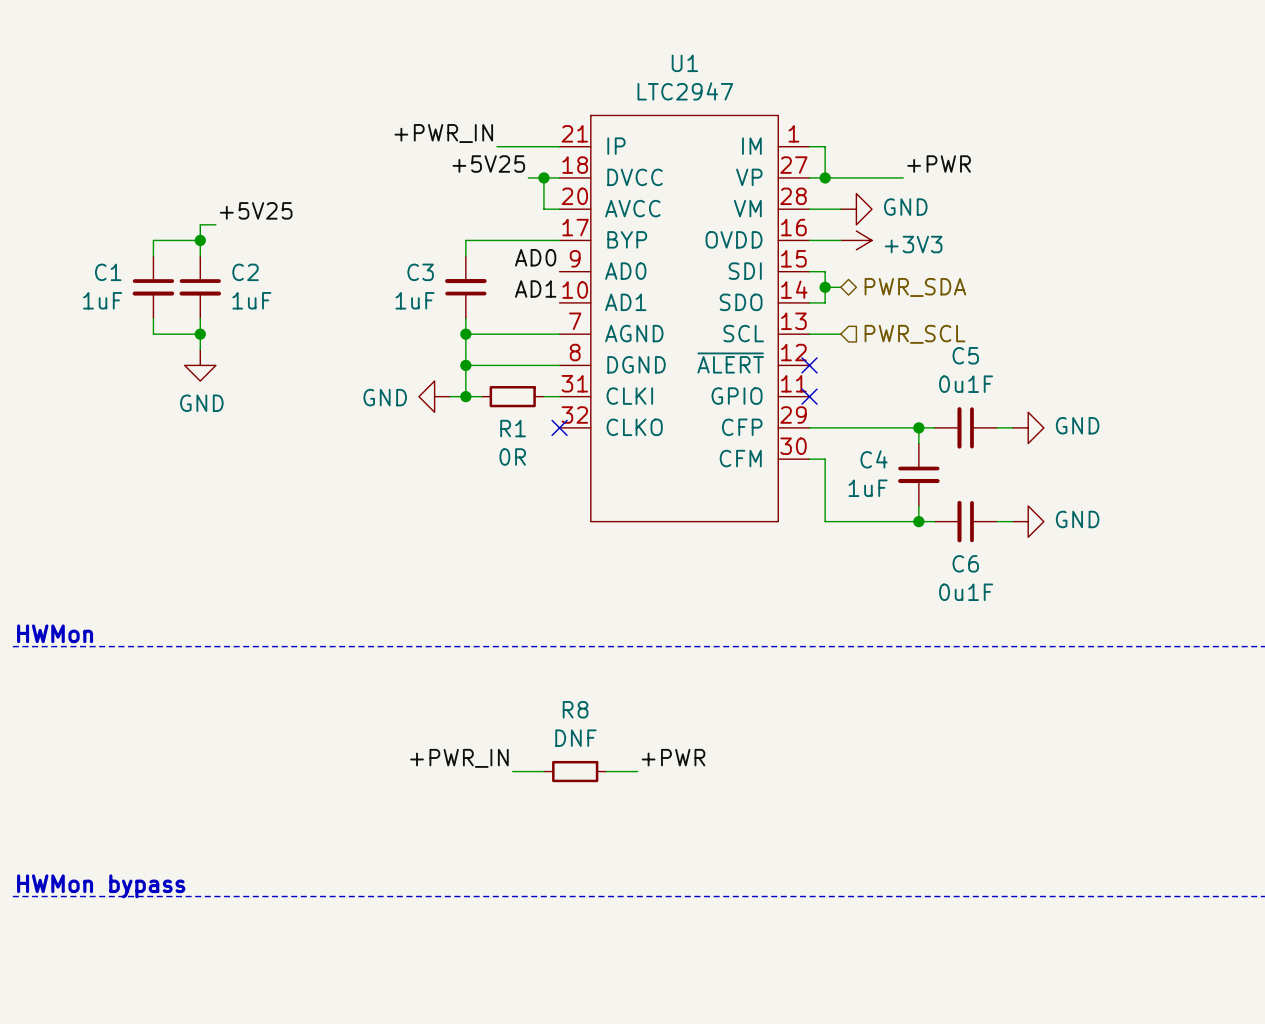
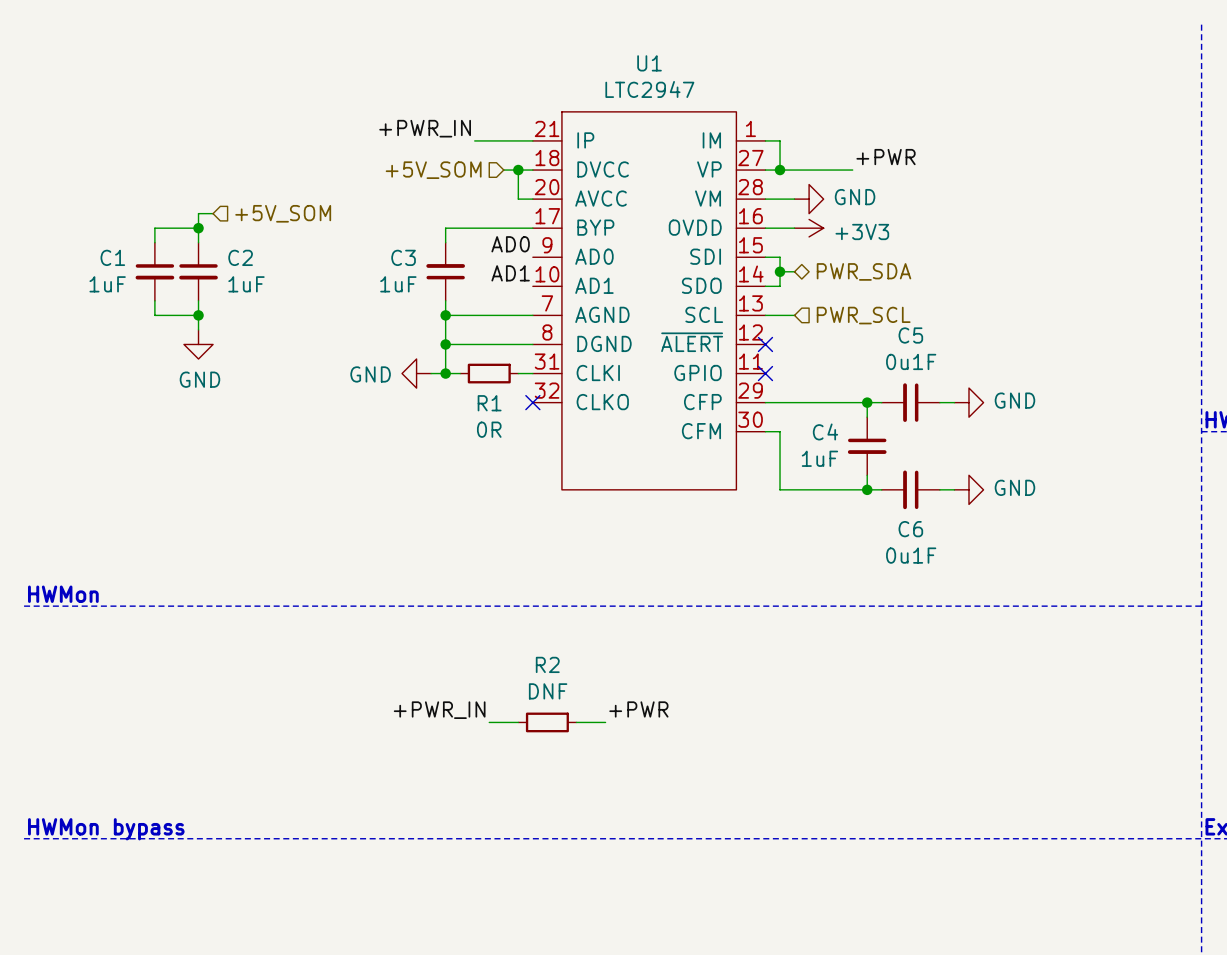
label: +5V25 (488, 164) -> none
hierarchical label: none -> +5V_SOM (433, 170)
label: +5V25 (256, 210) -> none
hierarchical label: none -> +5V_SOM (283, 213)
R8 name: R8 (575, 709) -> R2 (547, 664)

